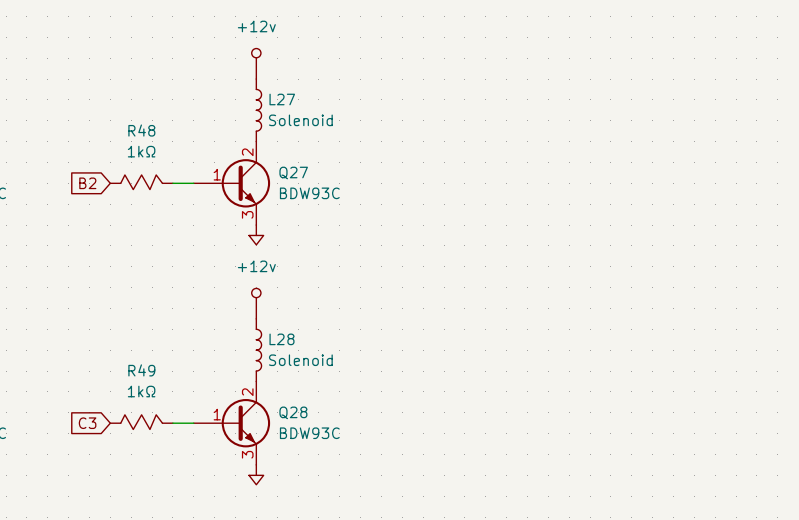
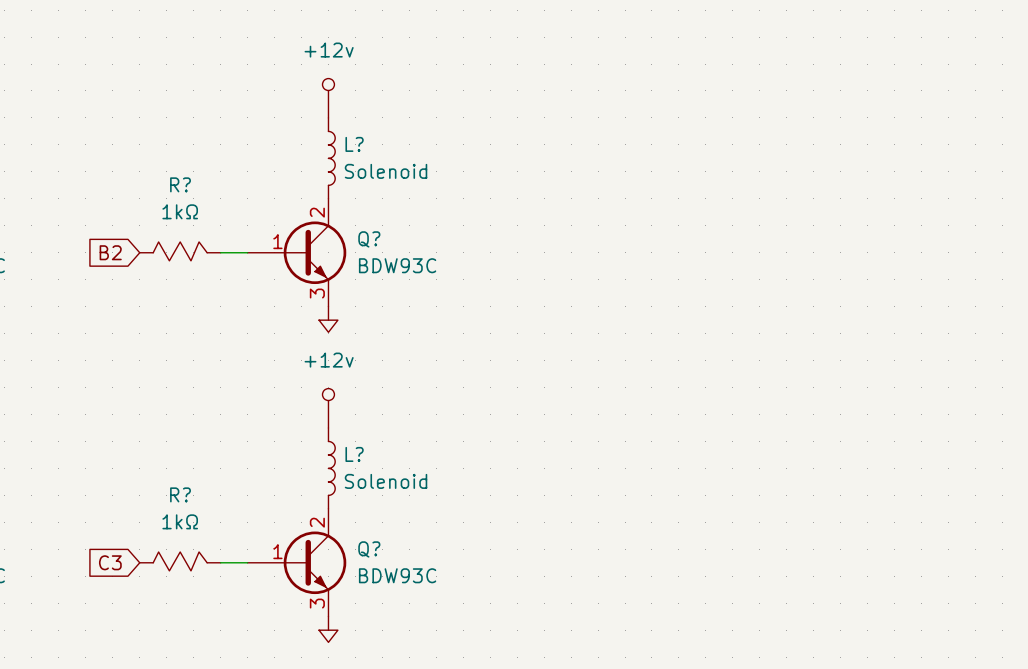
L27 name: L27 (282, 99) -> L? (354, 144)
R48 name: R48 (141, 130) -> R? (180, 184)
Q27 name: Q27 (293, 172) -> Q? (369, 239)
L28 name: L28 (281, 339) -> L? (354, 454)
R49 name: R49 (141, 370) -> R? (180, 494)
Q28 name: Q28 (293, 412) -> Q? (369, 549)

